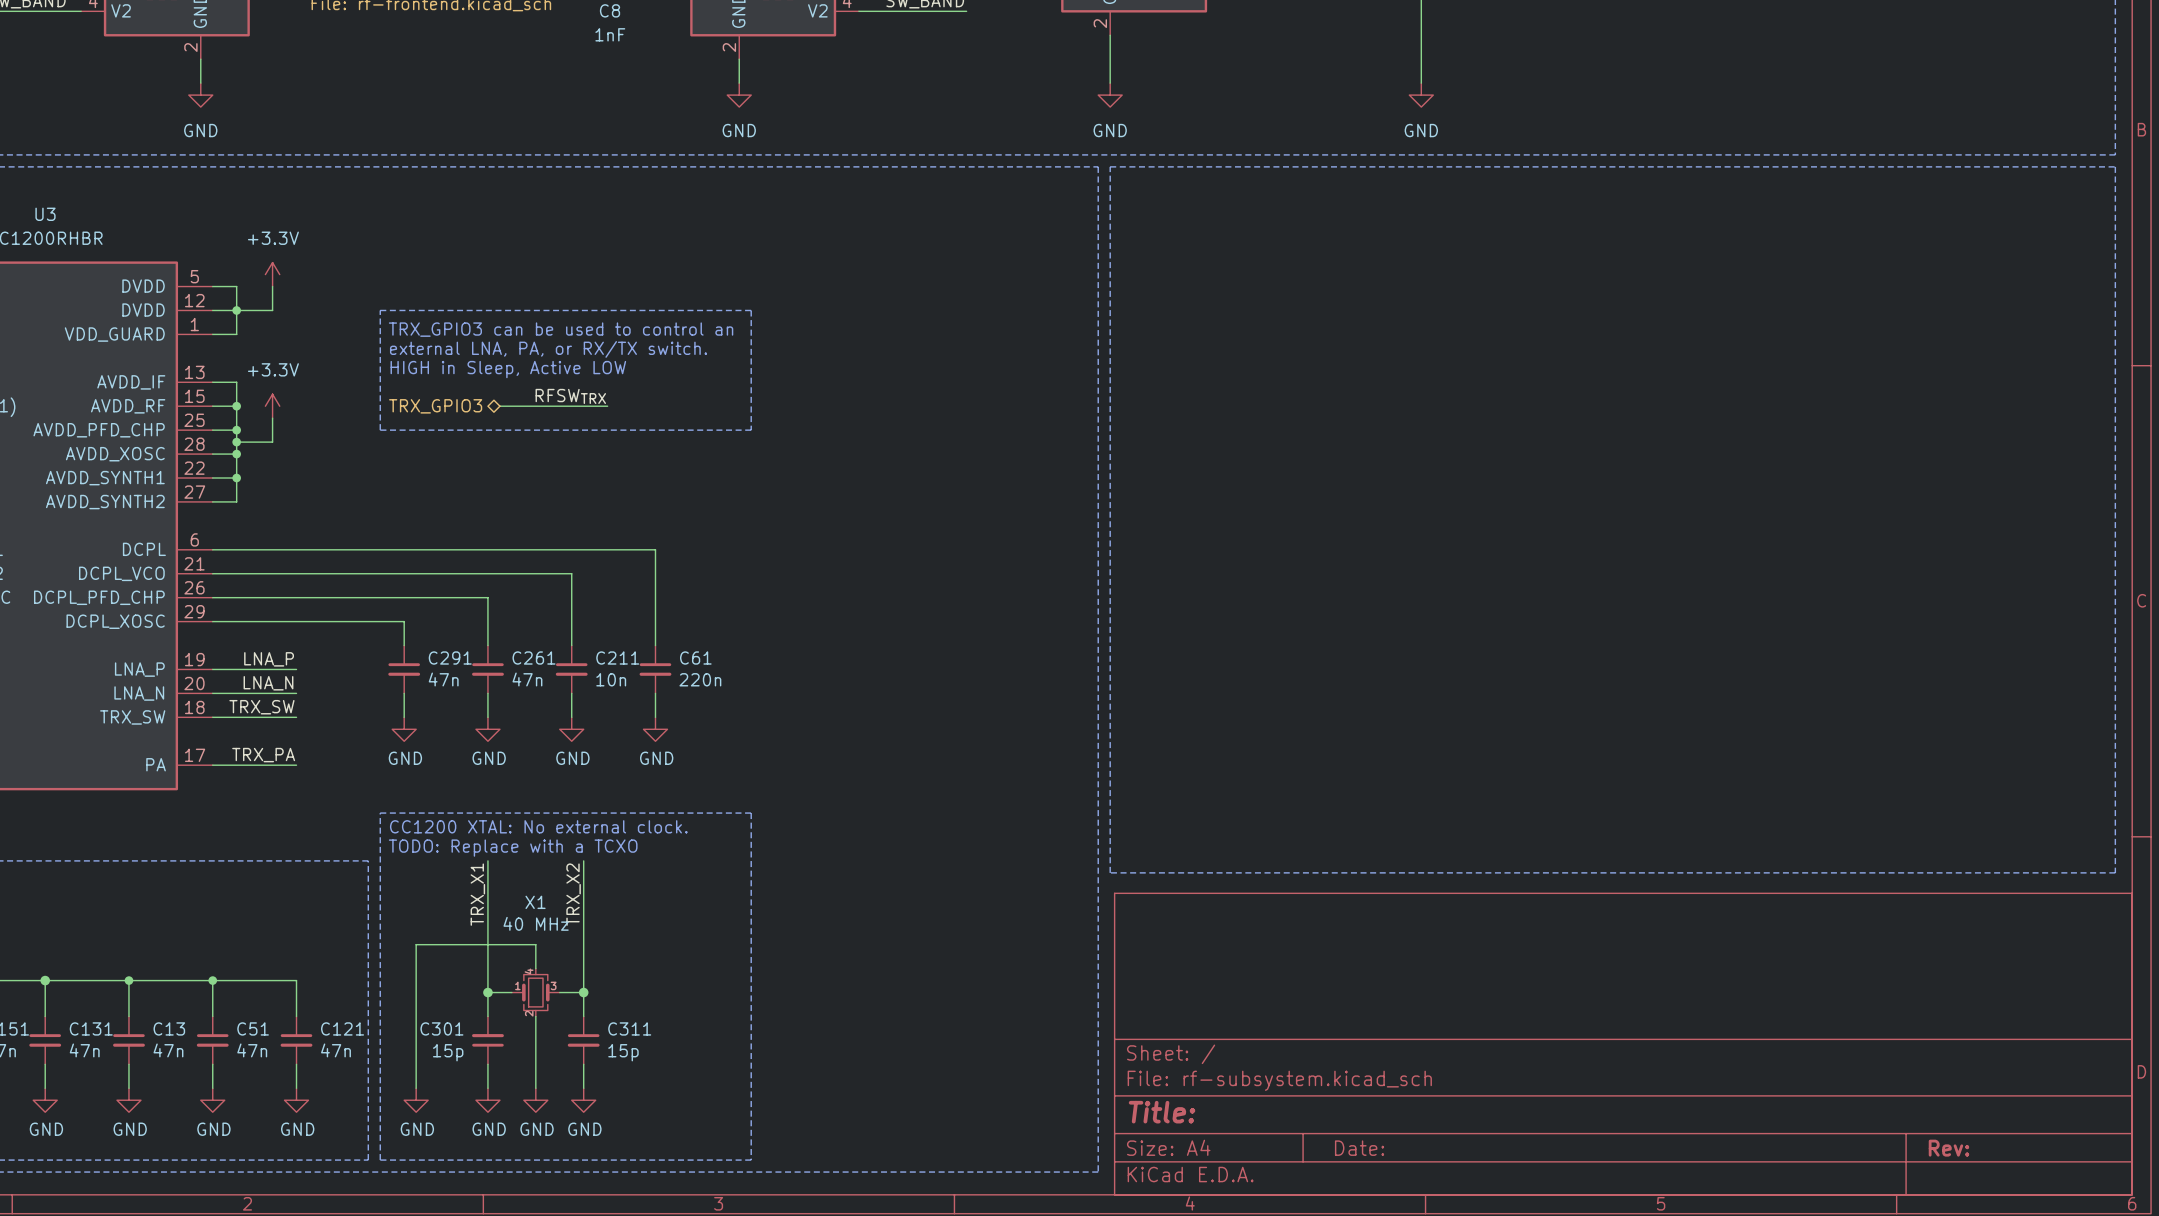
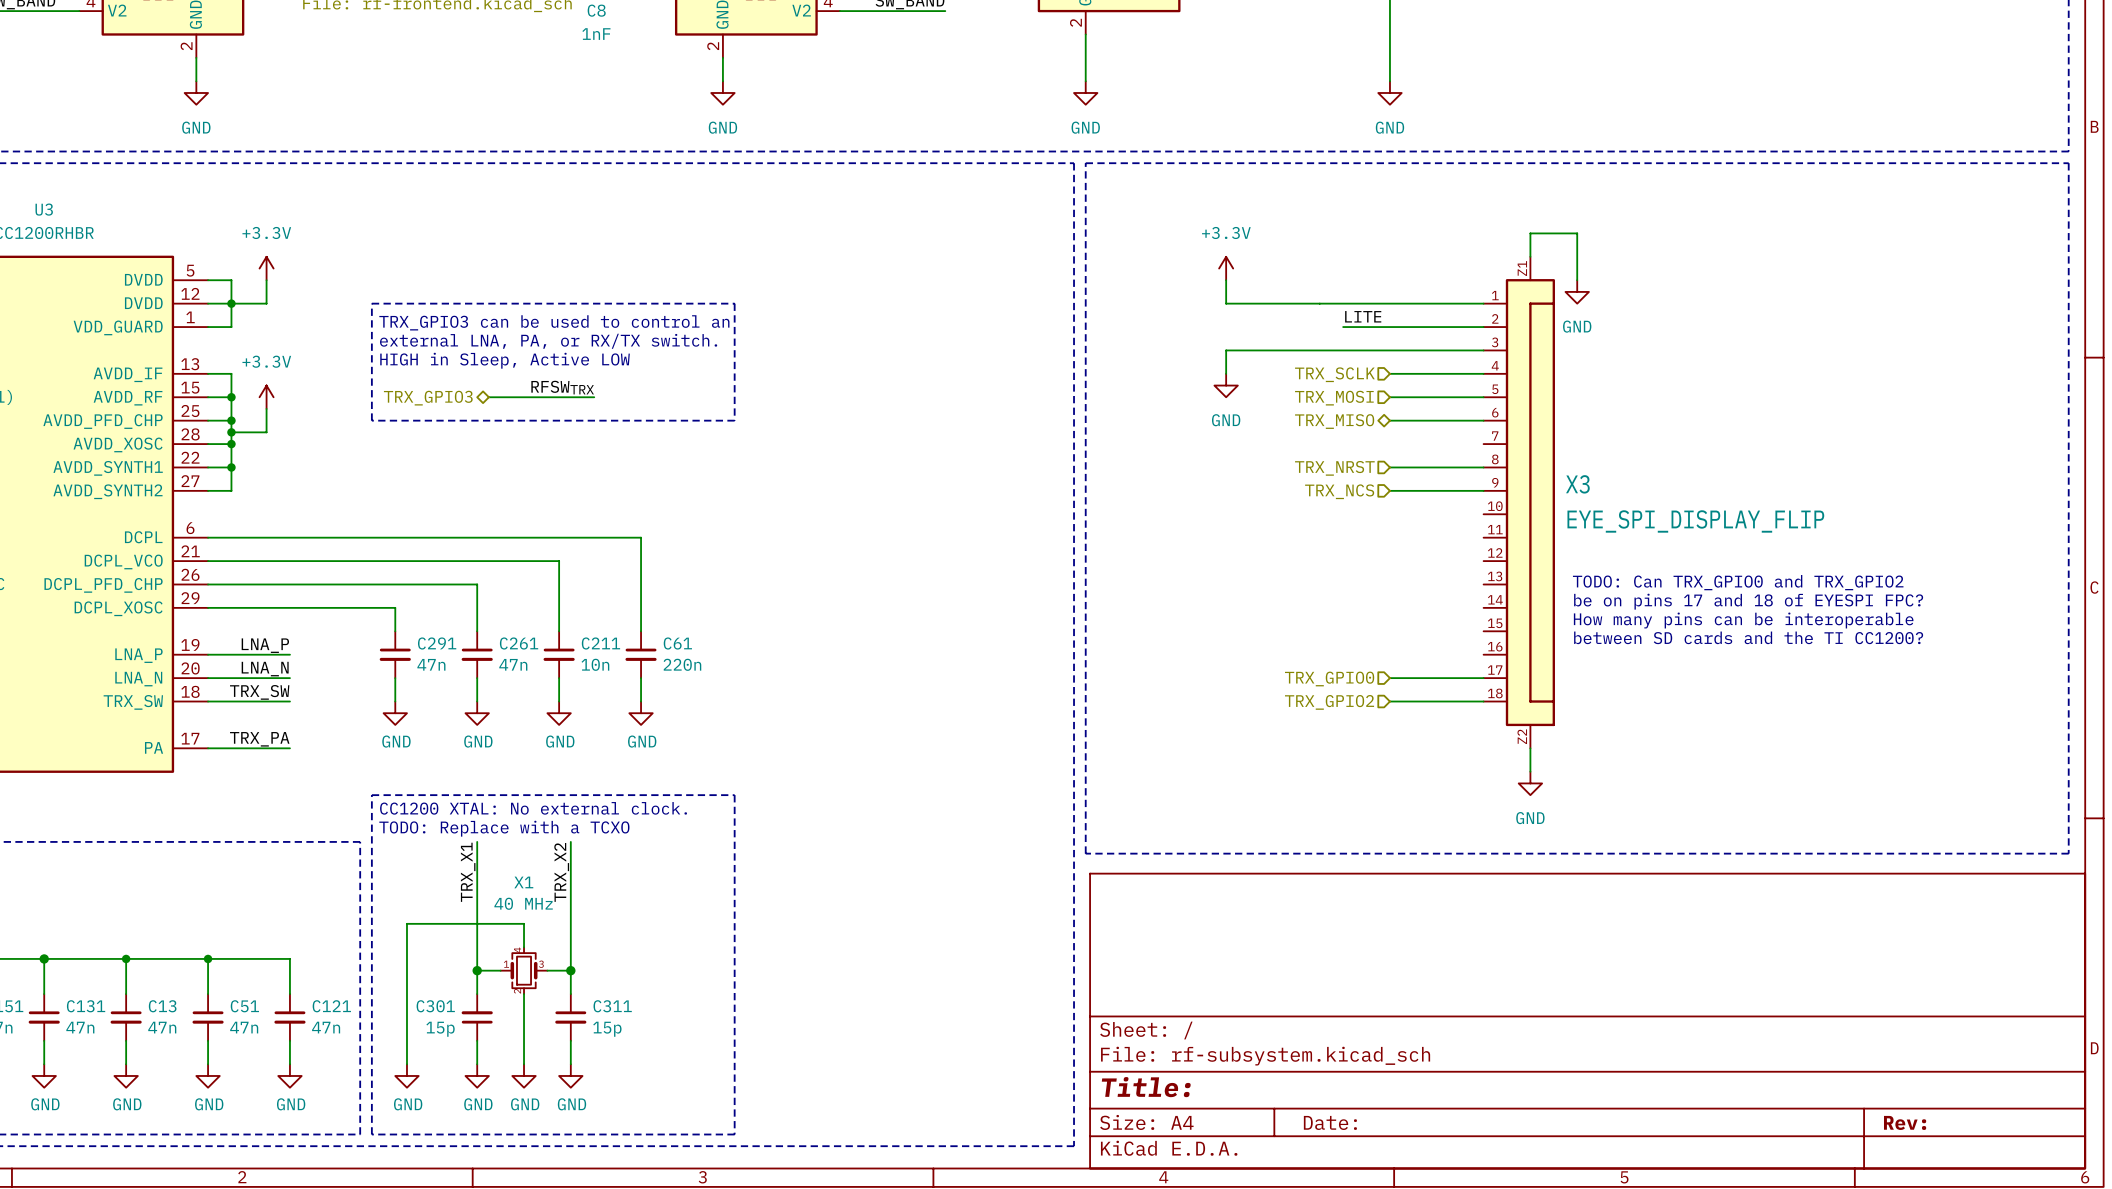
wire: none -> (1530, 256) (1530, 233) (1577, 233) (1577, 280)
power symbol: none -> +3.3V (1226, 268)
wire: none -> (1226, 280) (1226, 303) (1483, 303)
power symbol: none -> GND (1577, 291)
label: none -> LITE (1363, 316)
wire: none -> (1343, 327) (1483, 327)
wire: none -> (1483, 350) (1226, 350) (1226, 373)
hierarchical label: none -> TRX_SCLK (1334, 374)
wire: none -> (1389, 373) (1483, 373)
power symbol: none -> GND (1226, 385)
hierarchical label: none -> TRX_MOSI (1334, 398)
wire: none -> (1389, 397) (1483, 397)
hierarchical label: none -> TRX_MISO (1334, 421)
wire: none -> (1389, 420) (1483, 420)
hierarchical label: none -> TRX_NRST (1334, 468)
wire: none -> (1389, 467) (1483, 467)
wire: none -> (1389, 490) (1483, 490)
hierarchical label: none -> TRX_NCS (1339, 491)
X3: none -> EYE_SPI_DISPLAY_FLIP (1519, 502)
text: none -> TODO: Can TRX_GPIO0 and TRX_GPIO2 (1738, 582)
text: none -> be on pins 17 and 18 of EYESPI FPC? (1748, 601)
text: none -> How many pins can be interoperable (1743, 620)
text: none -> between SD cards and the TI CC1200? (1748, 637)
hierarchical label: none -> TRX_GPIO0 (1329, 678)
wire: none -> (1389, 678) (1483, 678)
hierarchical label: none -> TRX_GPIO2 (1329, 702)
wire: none -> (1389, 701) (1483, 701)
wire: none -> (1530, 748) (1530, 771)
power symbol: none -> GND (1530, 783)

